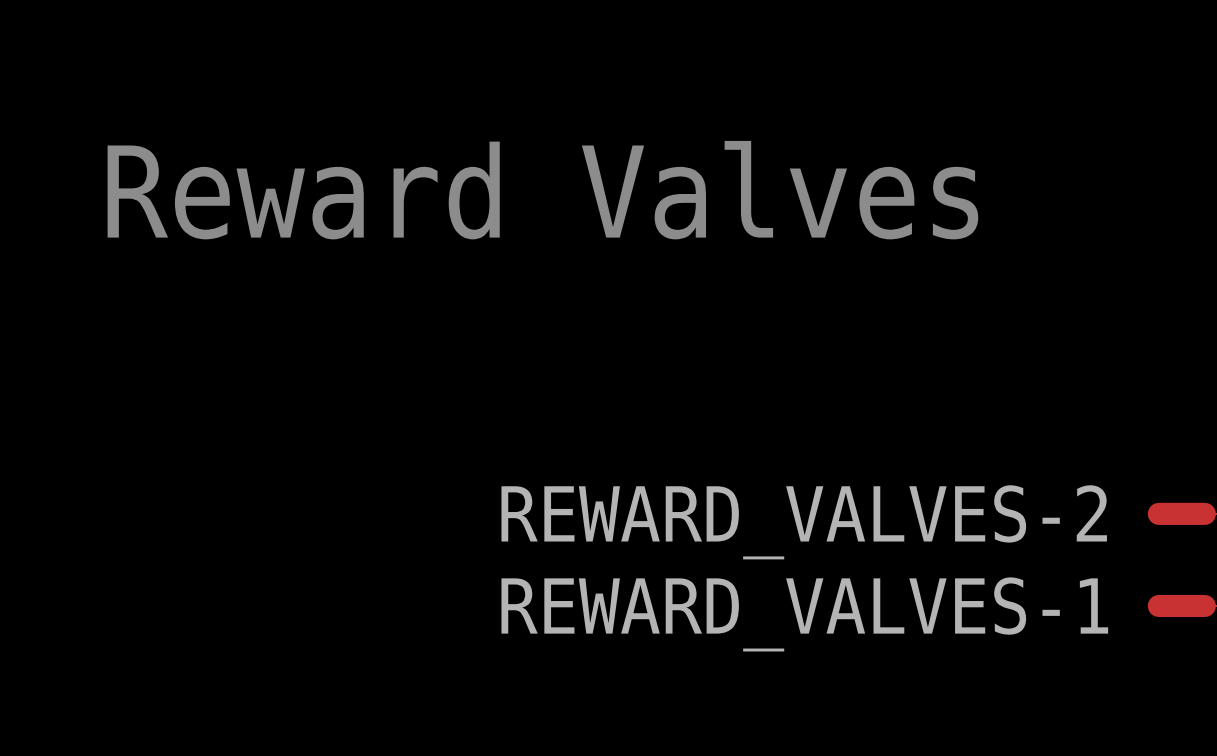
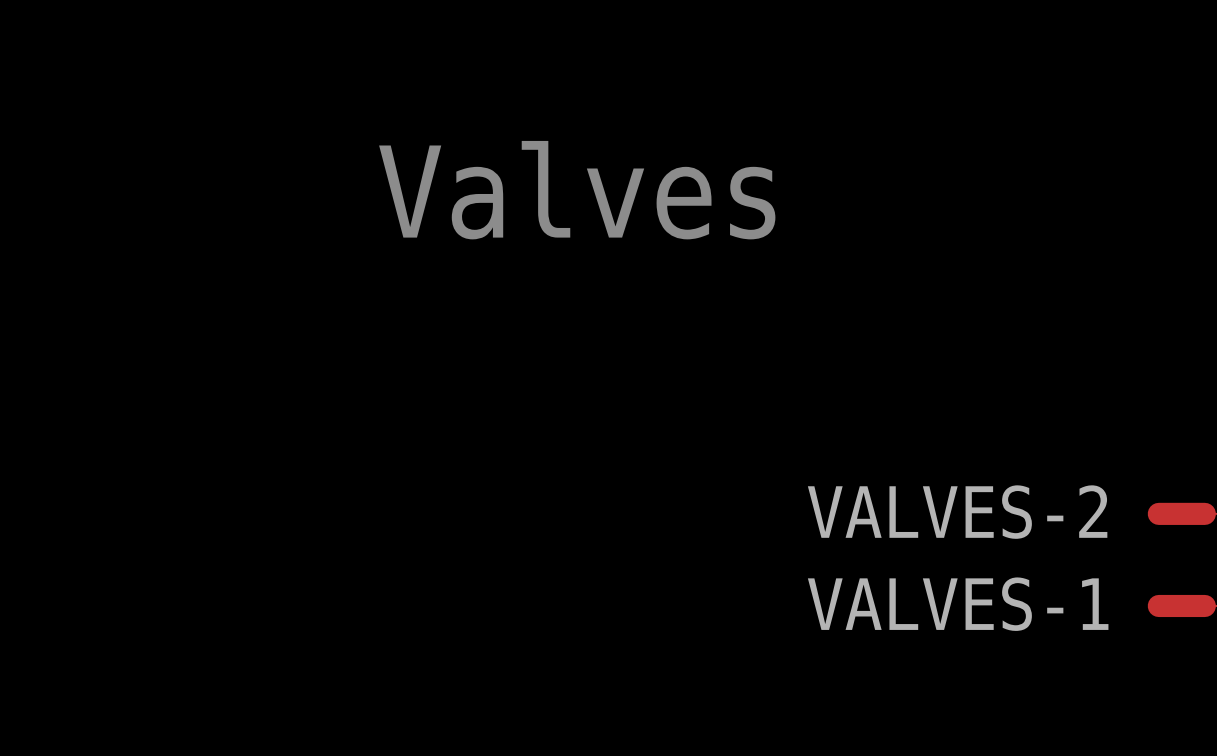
text: Reward Valves (542, 190) -> Valves (577, 190)
REWARD_VALVES-2 name: REWARD_VALVES-2 (804, 522) -> VALVES-2 (957, 512)
REWARD_VALVES-1 name: REWARD_VALVES-1 (804, 614) -> VALVES-1 (958, 604)

